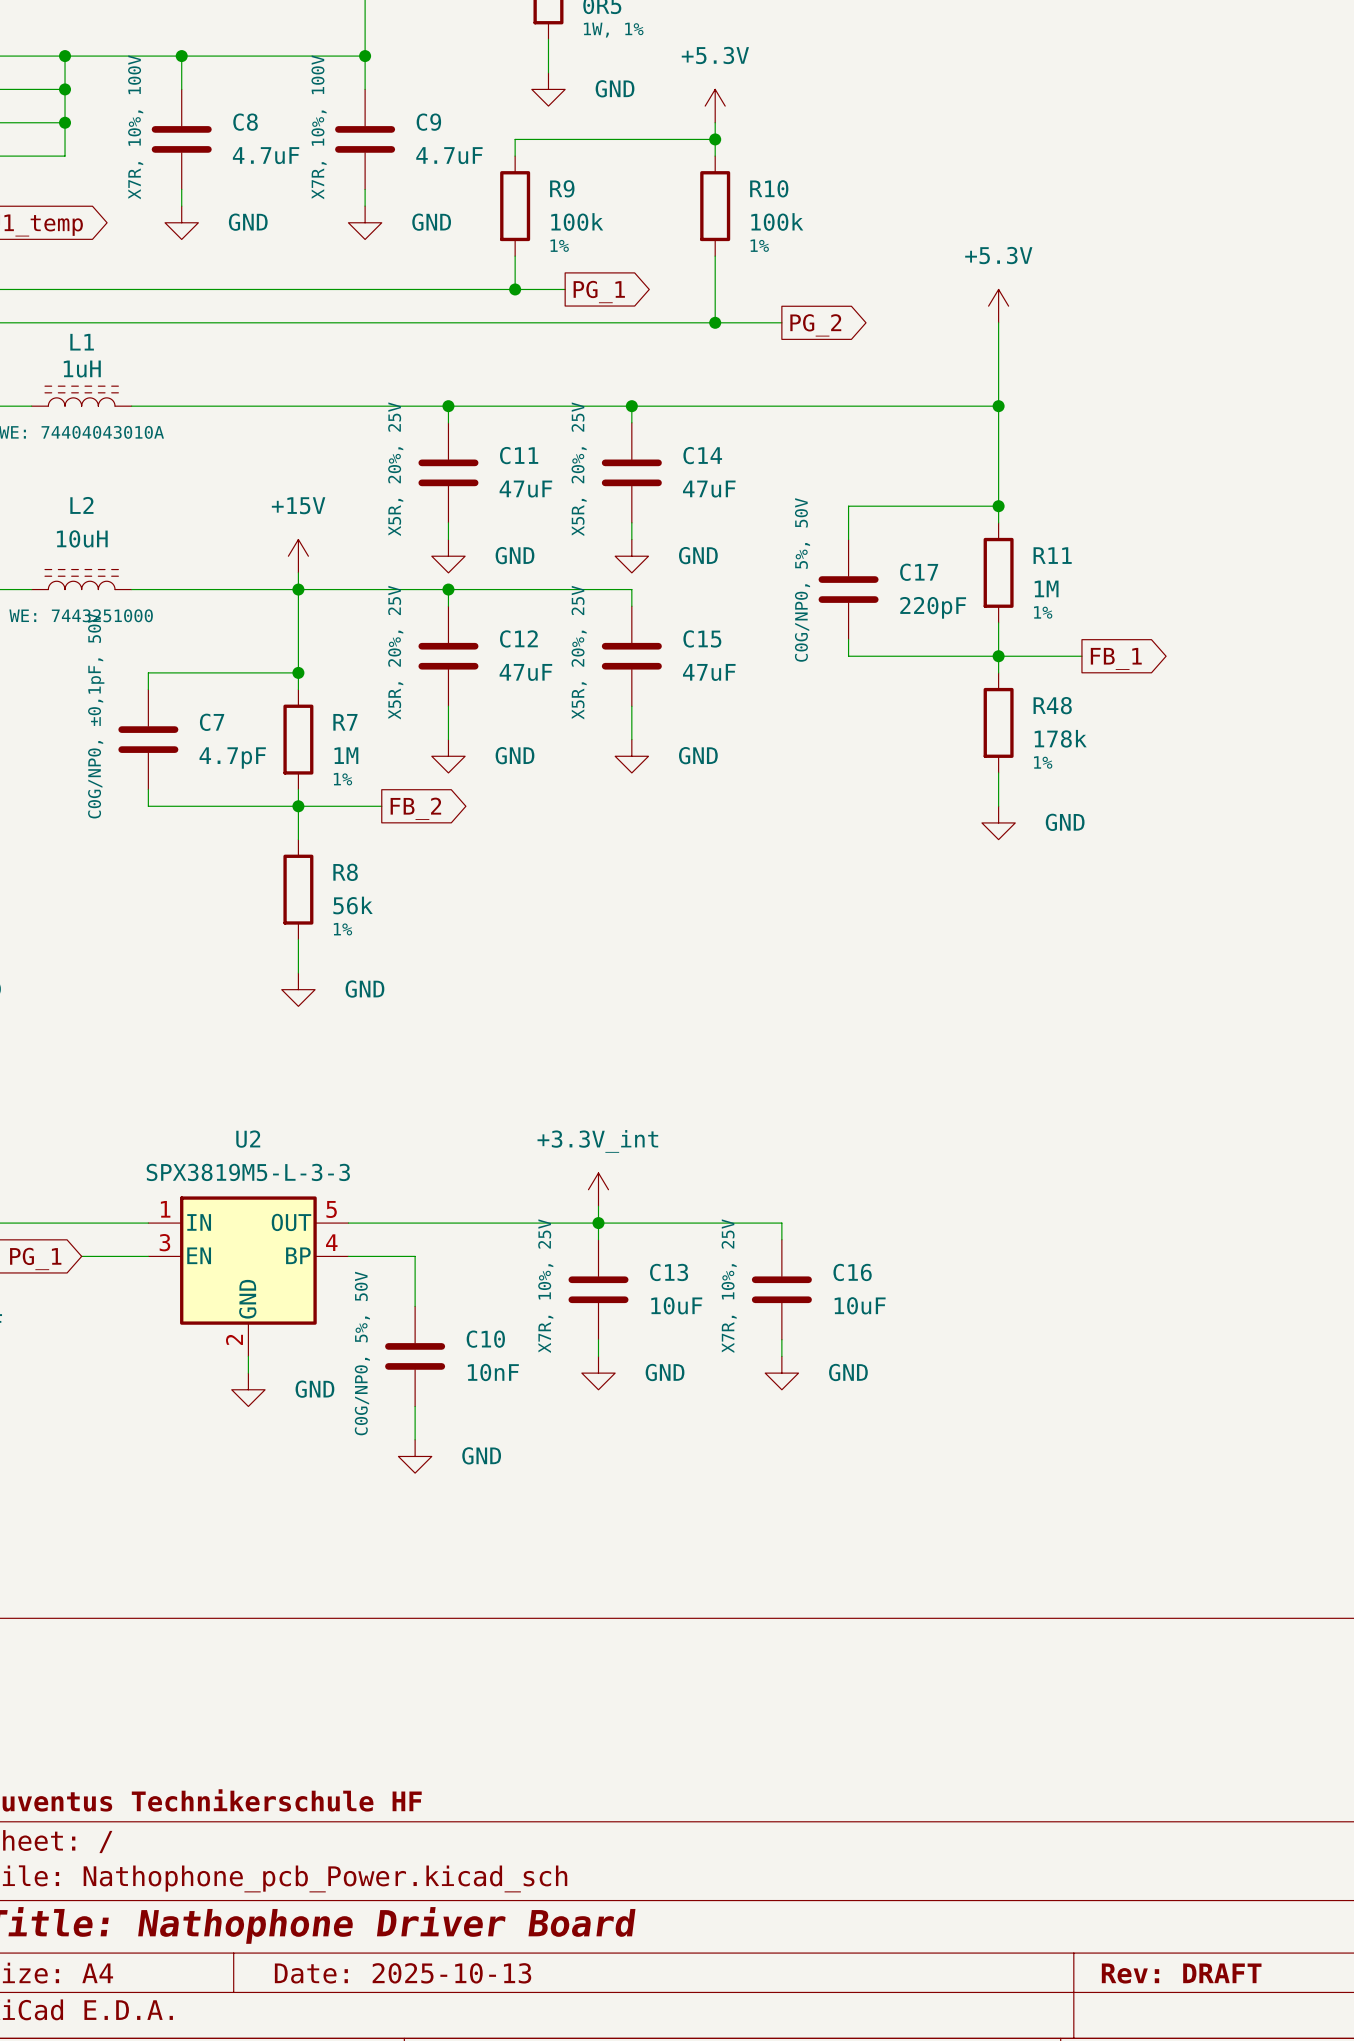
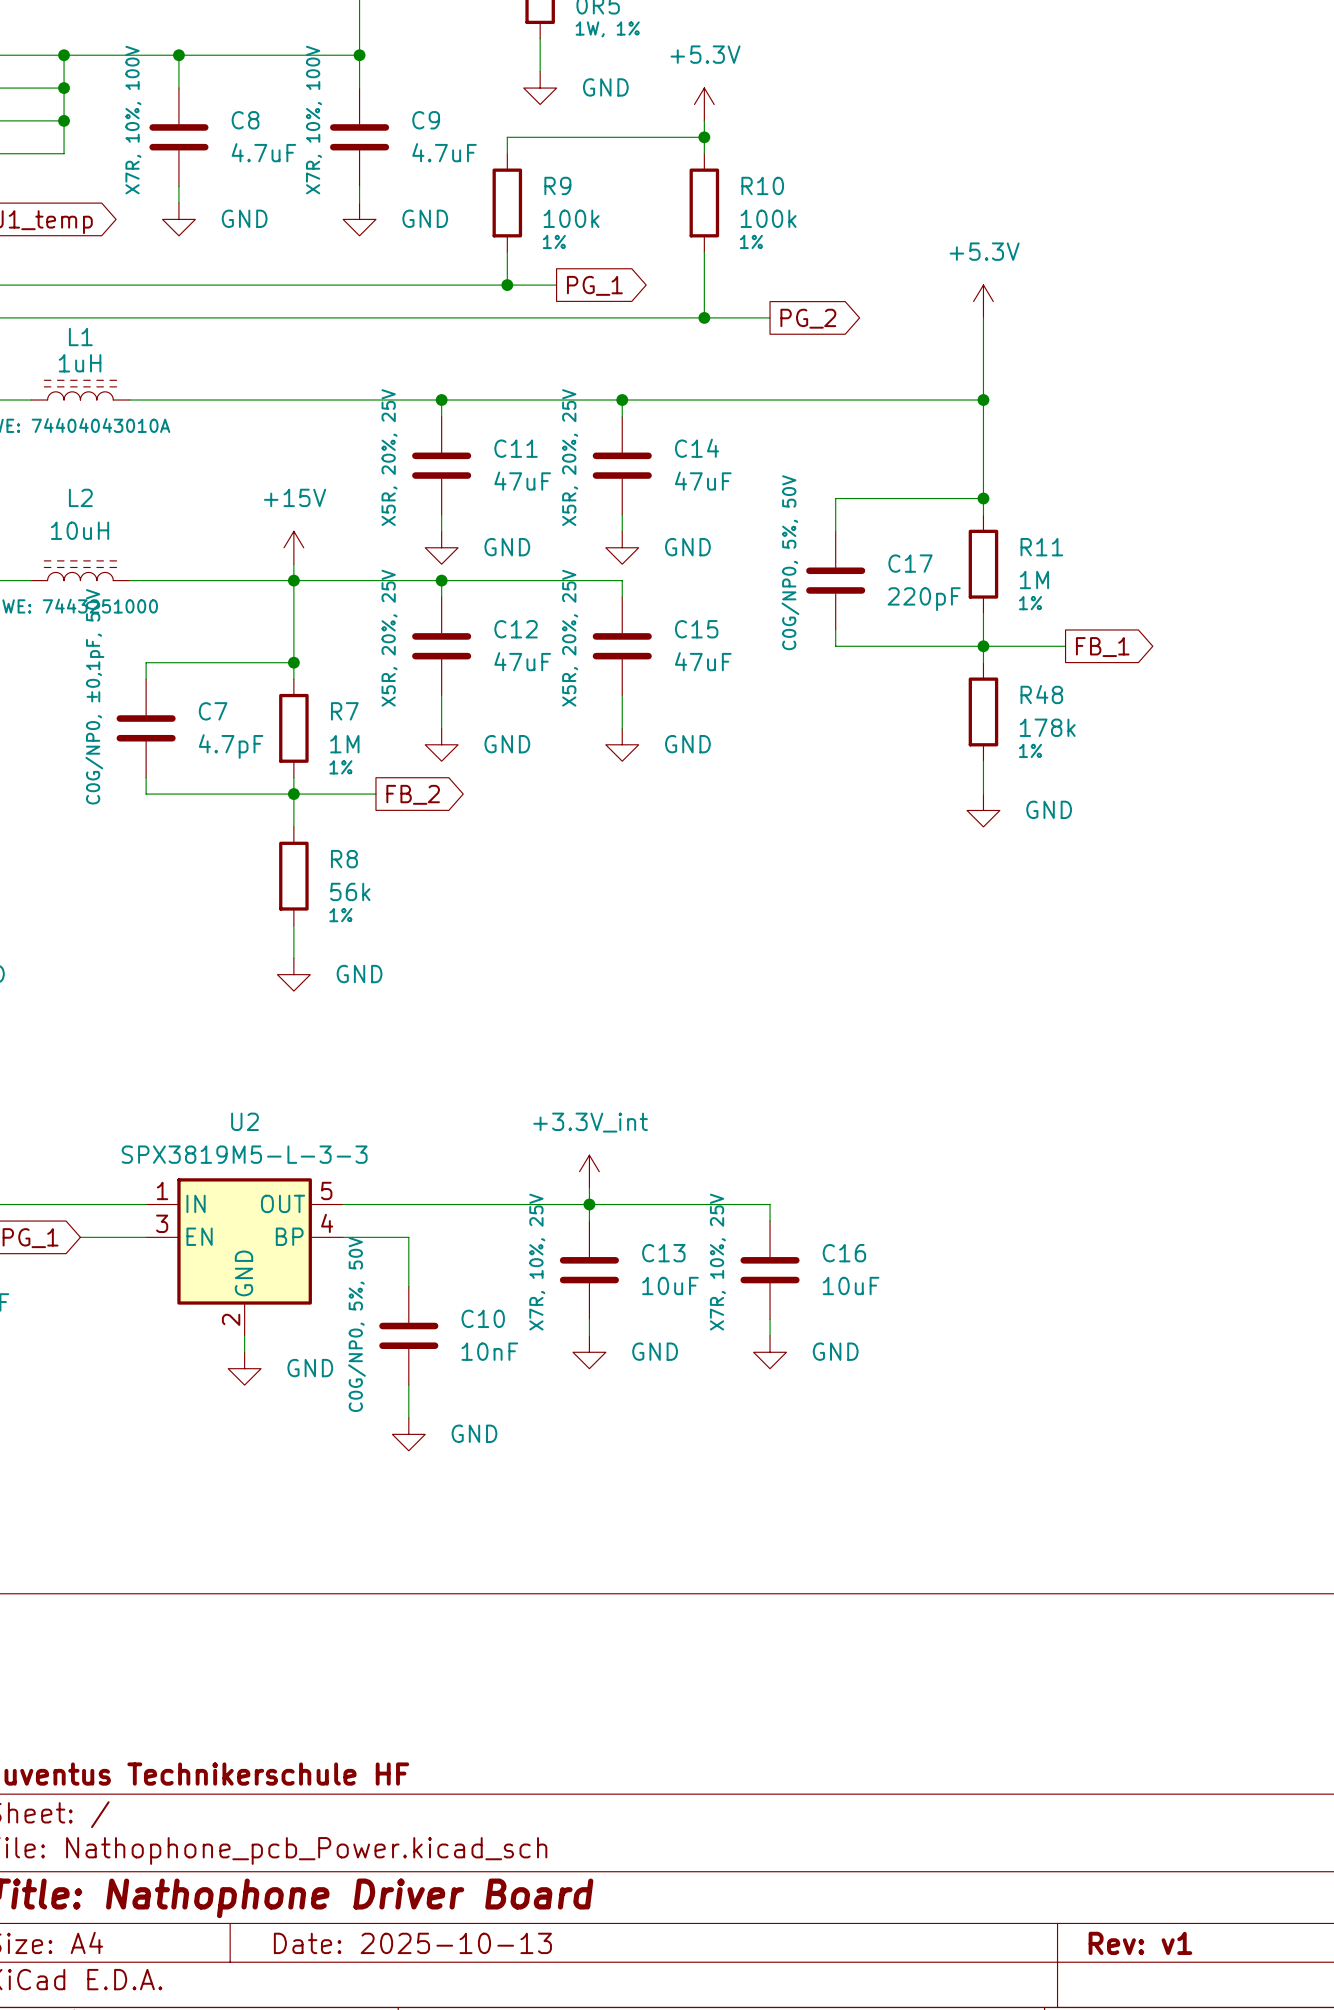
title block: Rev: DRAFT (1181, 1973) -> Rev: v1 (1140, 1943)

